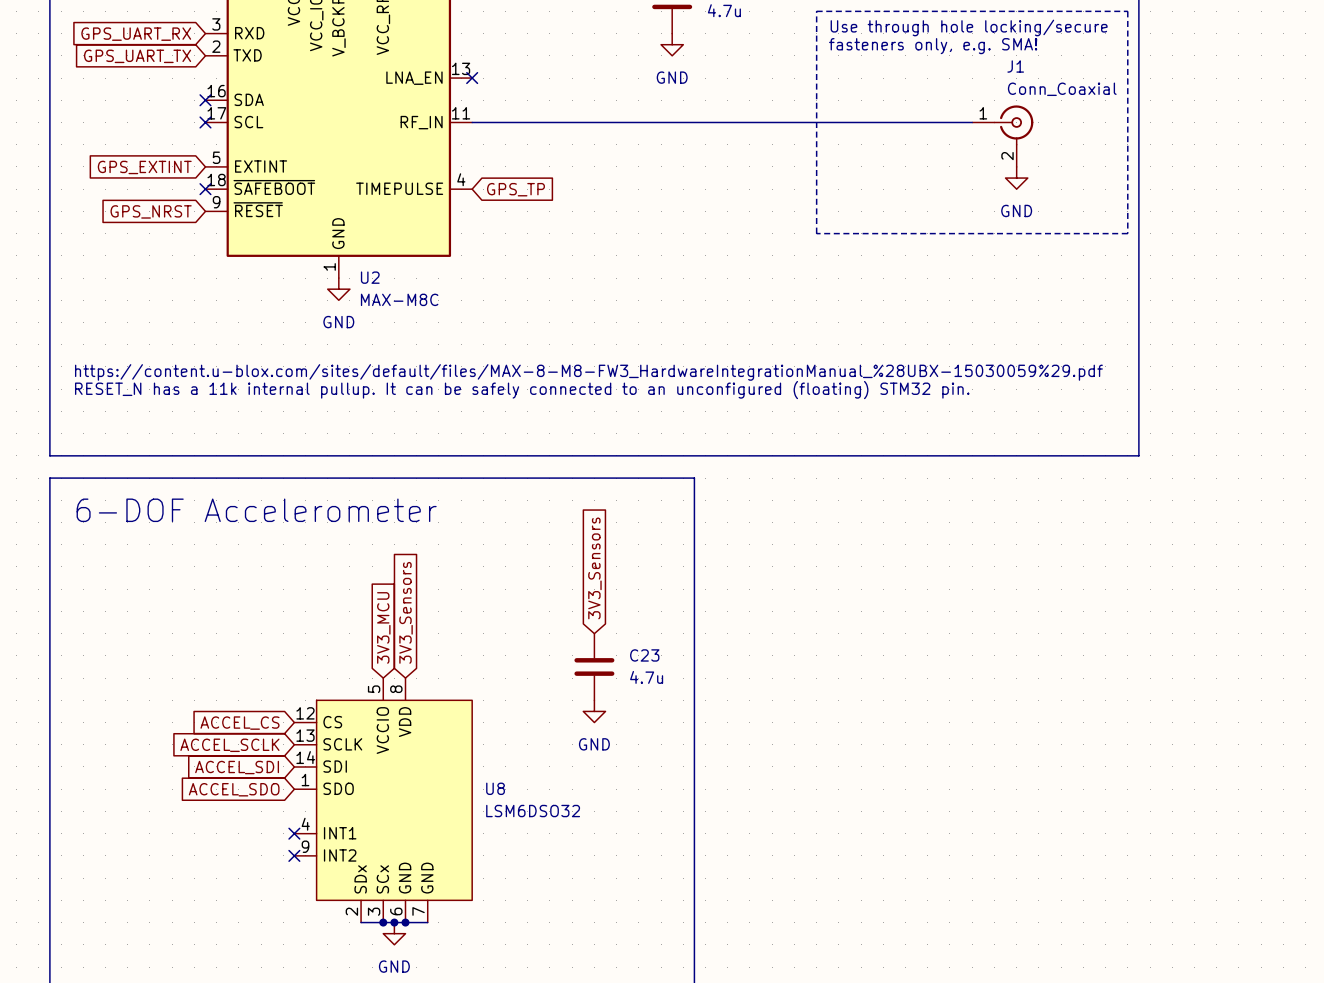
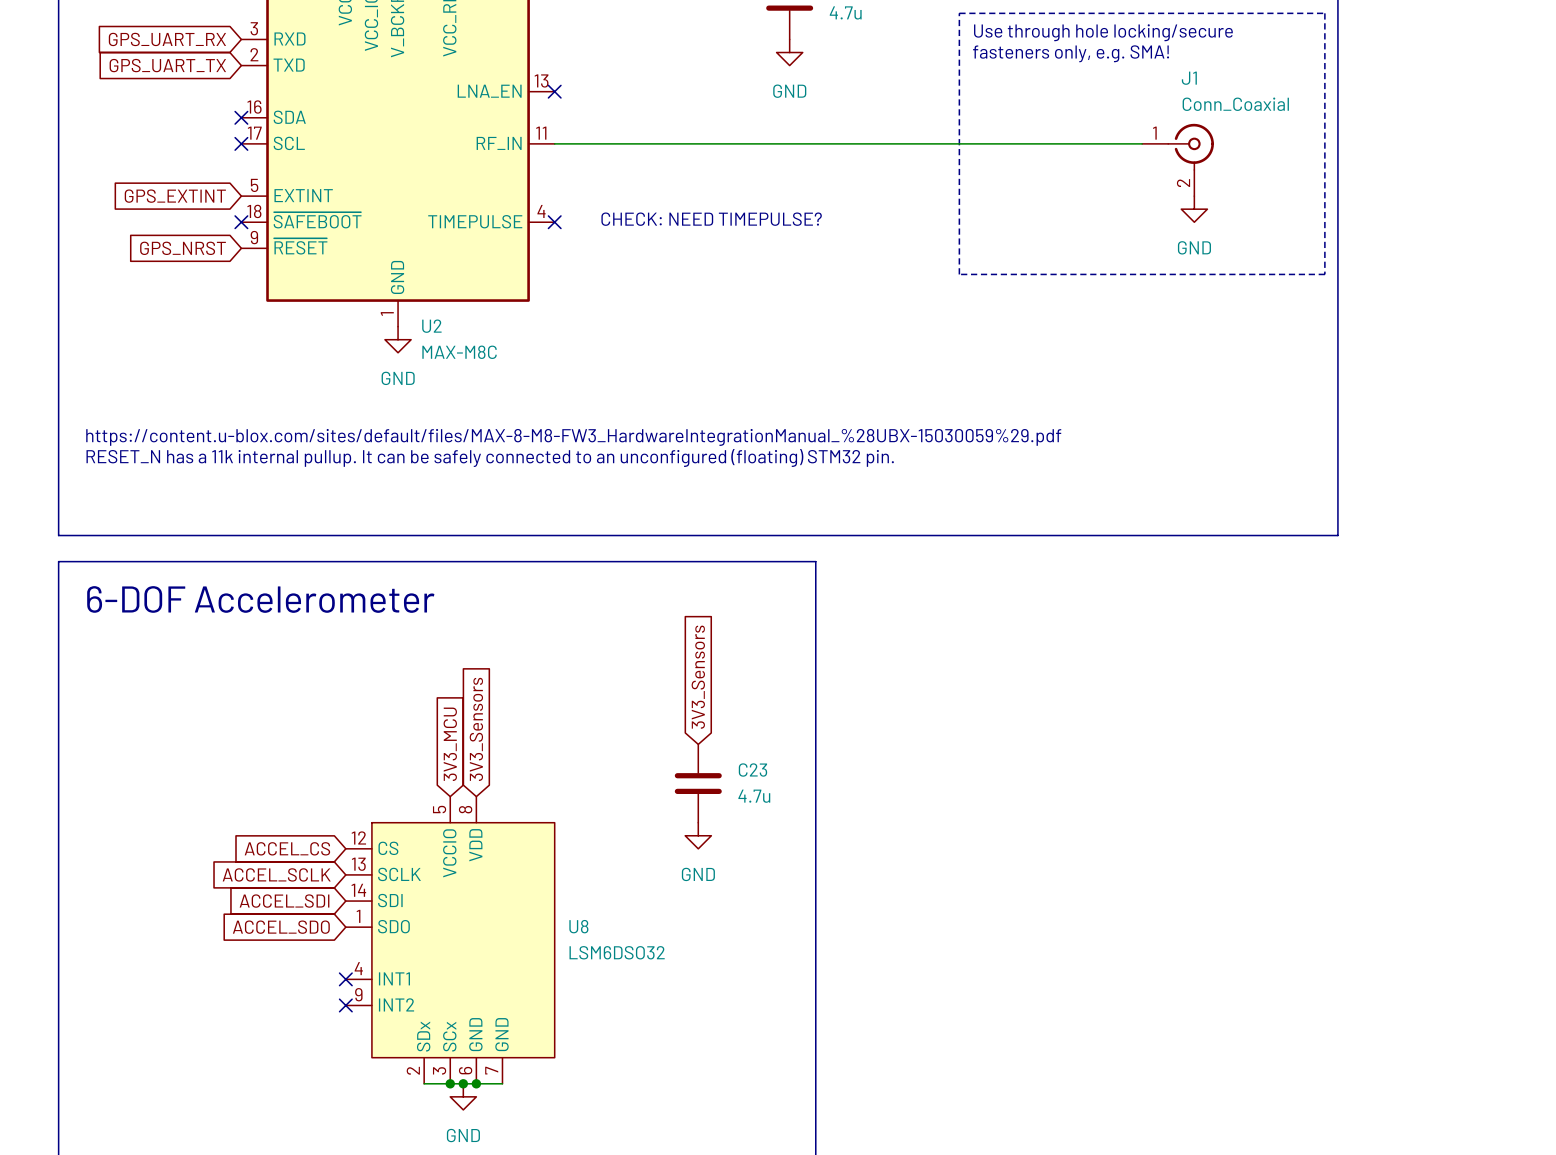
text: none -> CHECK: NEED TIMEPULSE? (711, 219)
no-connect mark: none -> (554, 222)
global label: GPS_TP (515, 189) -> none

